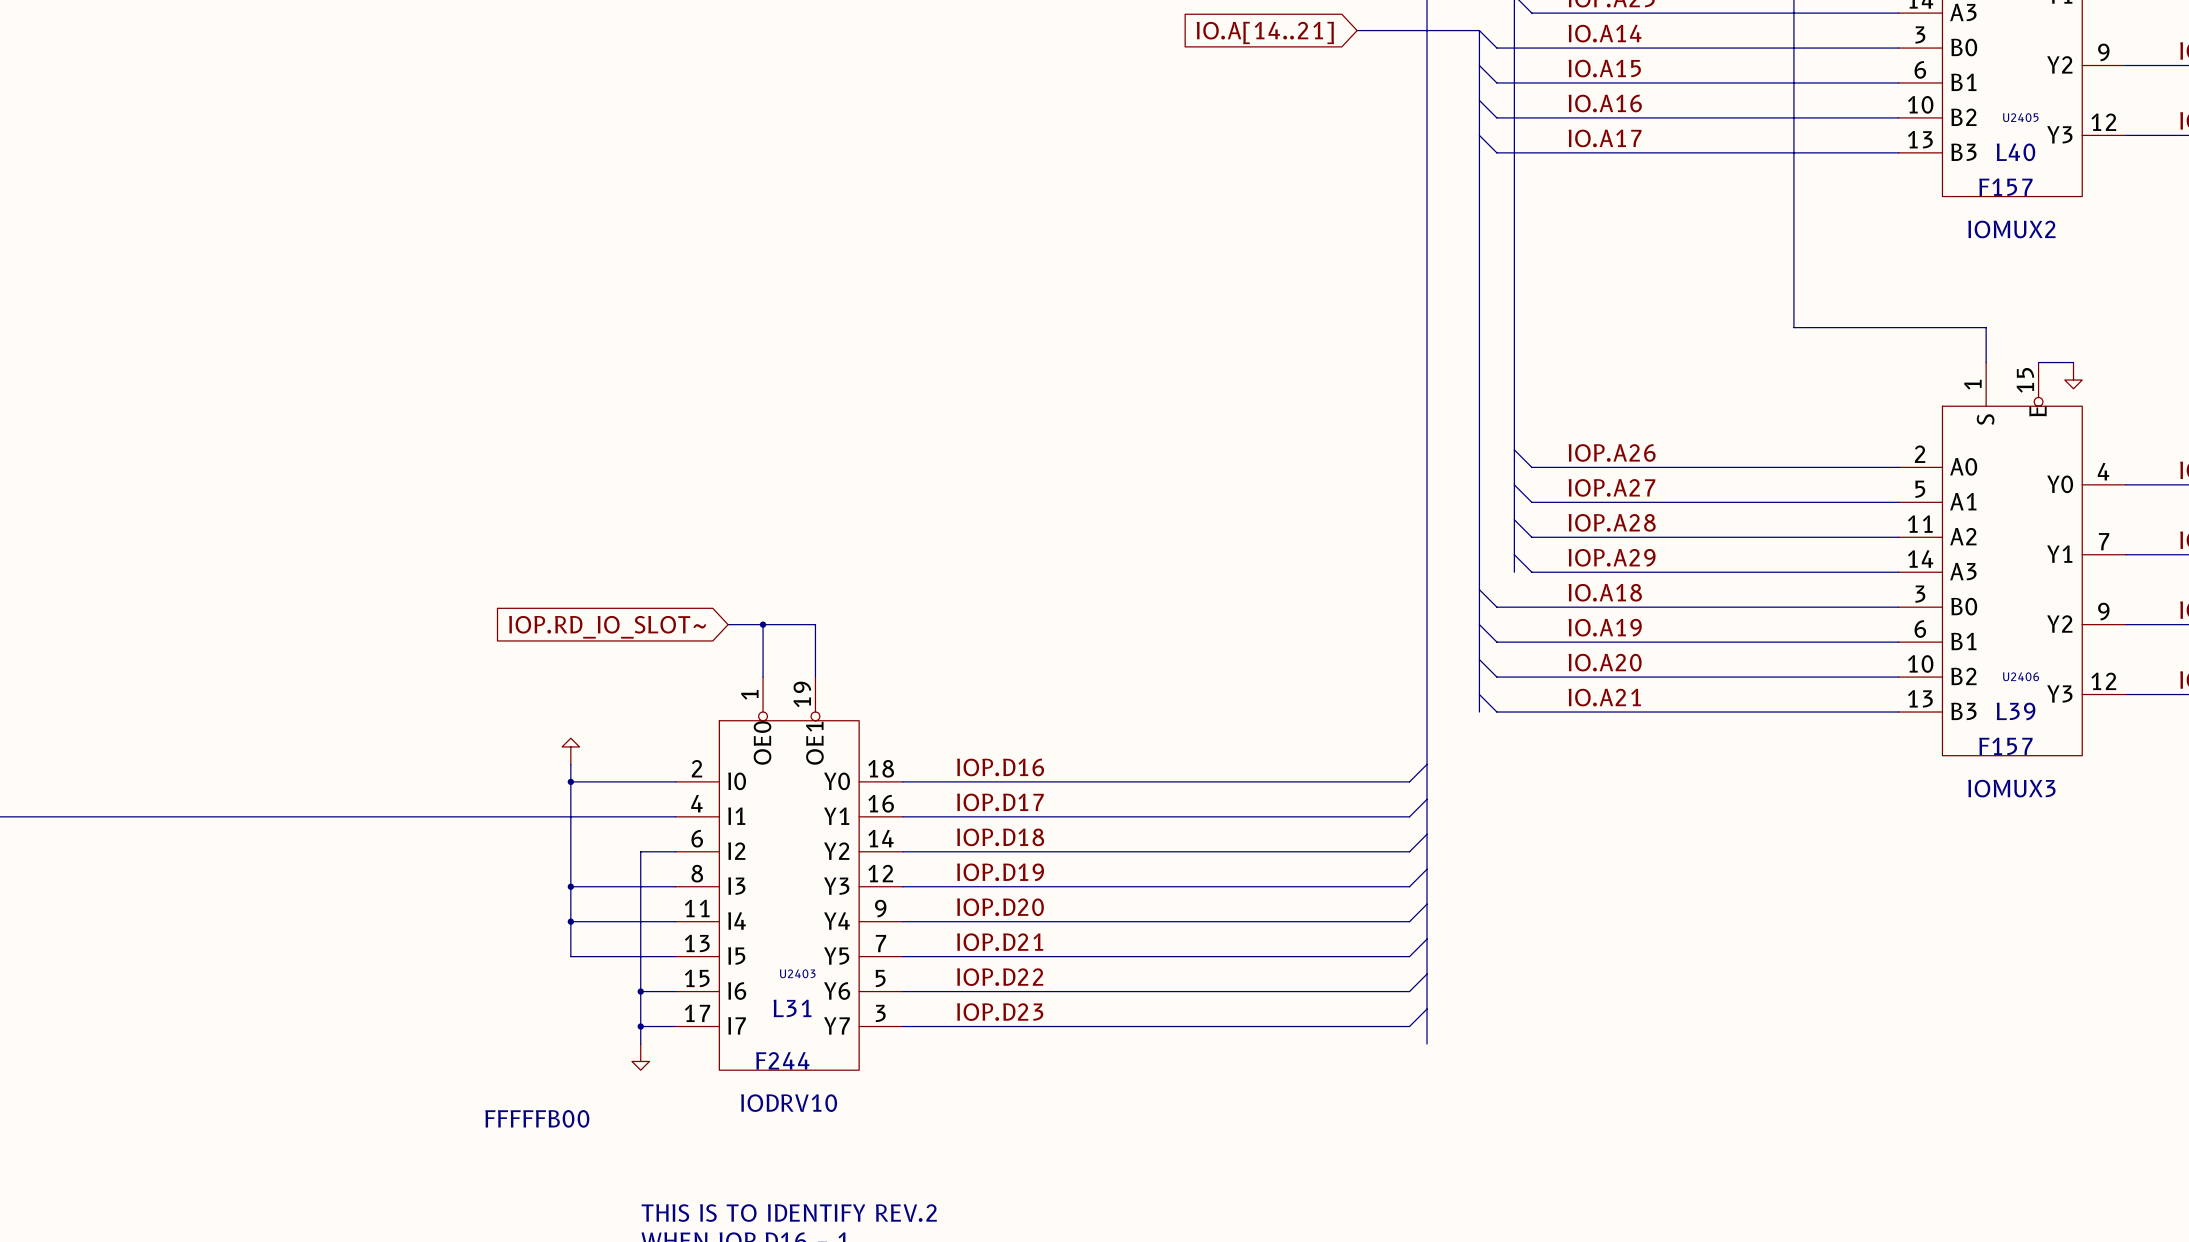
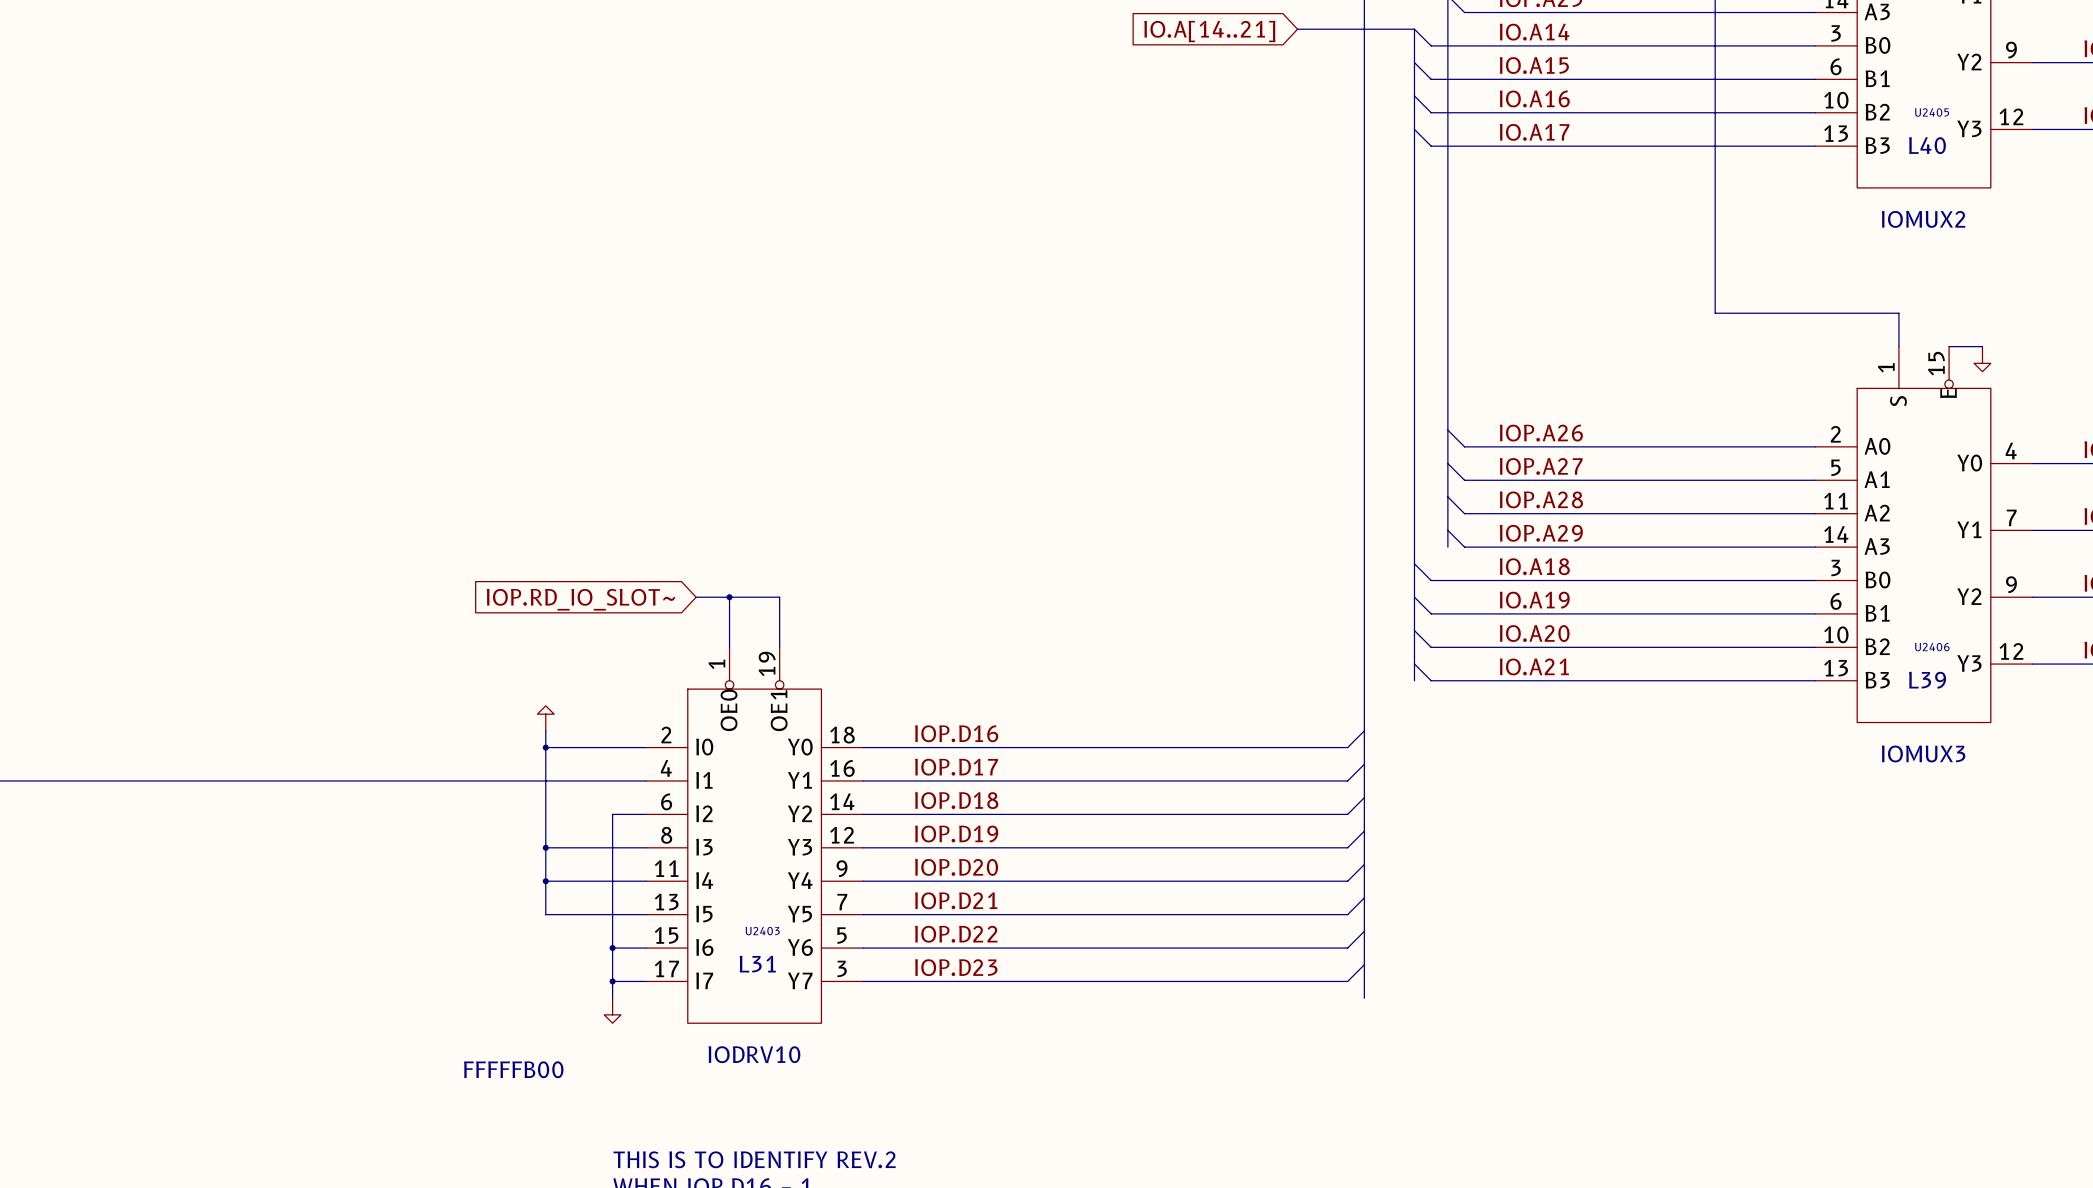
U2405 value: F157 (2005, 187) -> none
U2406 value: F157 (2005, 746) -> none
U2403 value: F244 (782, 1060) -> none

